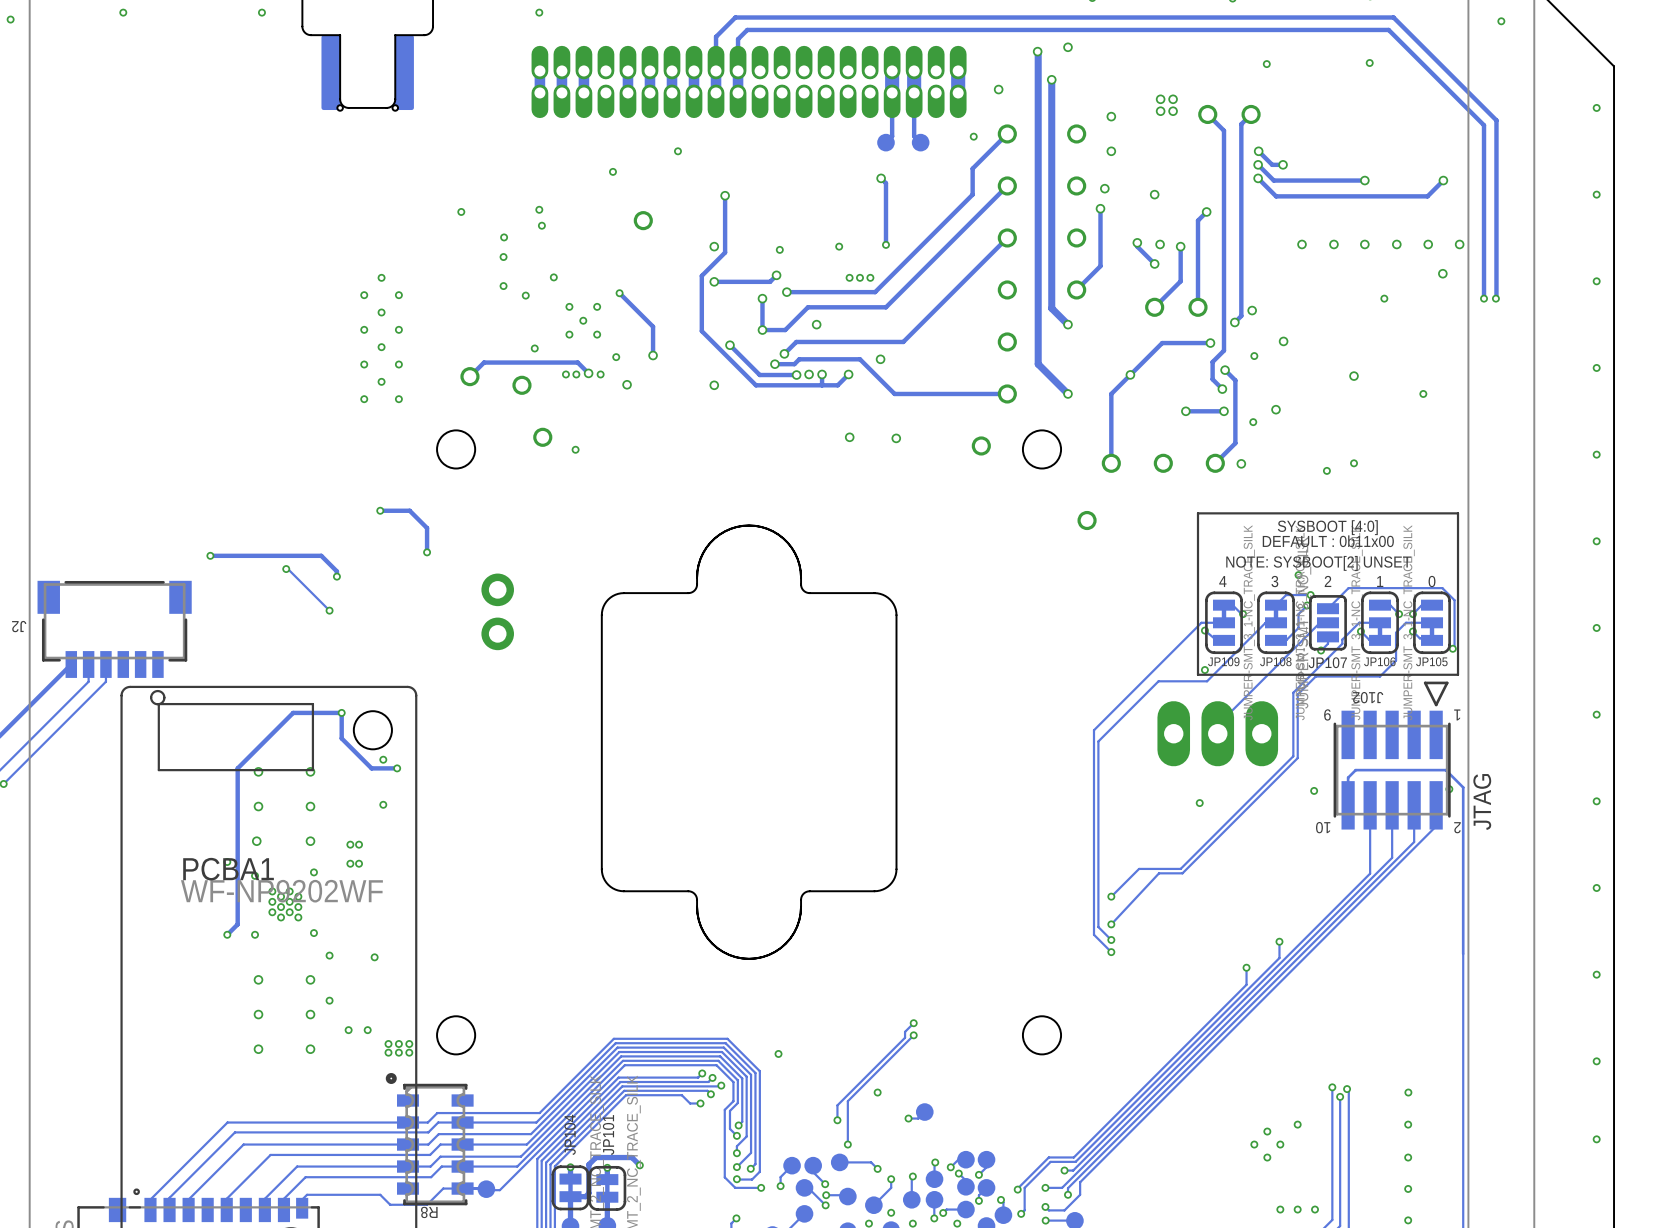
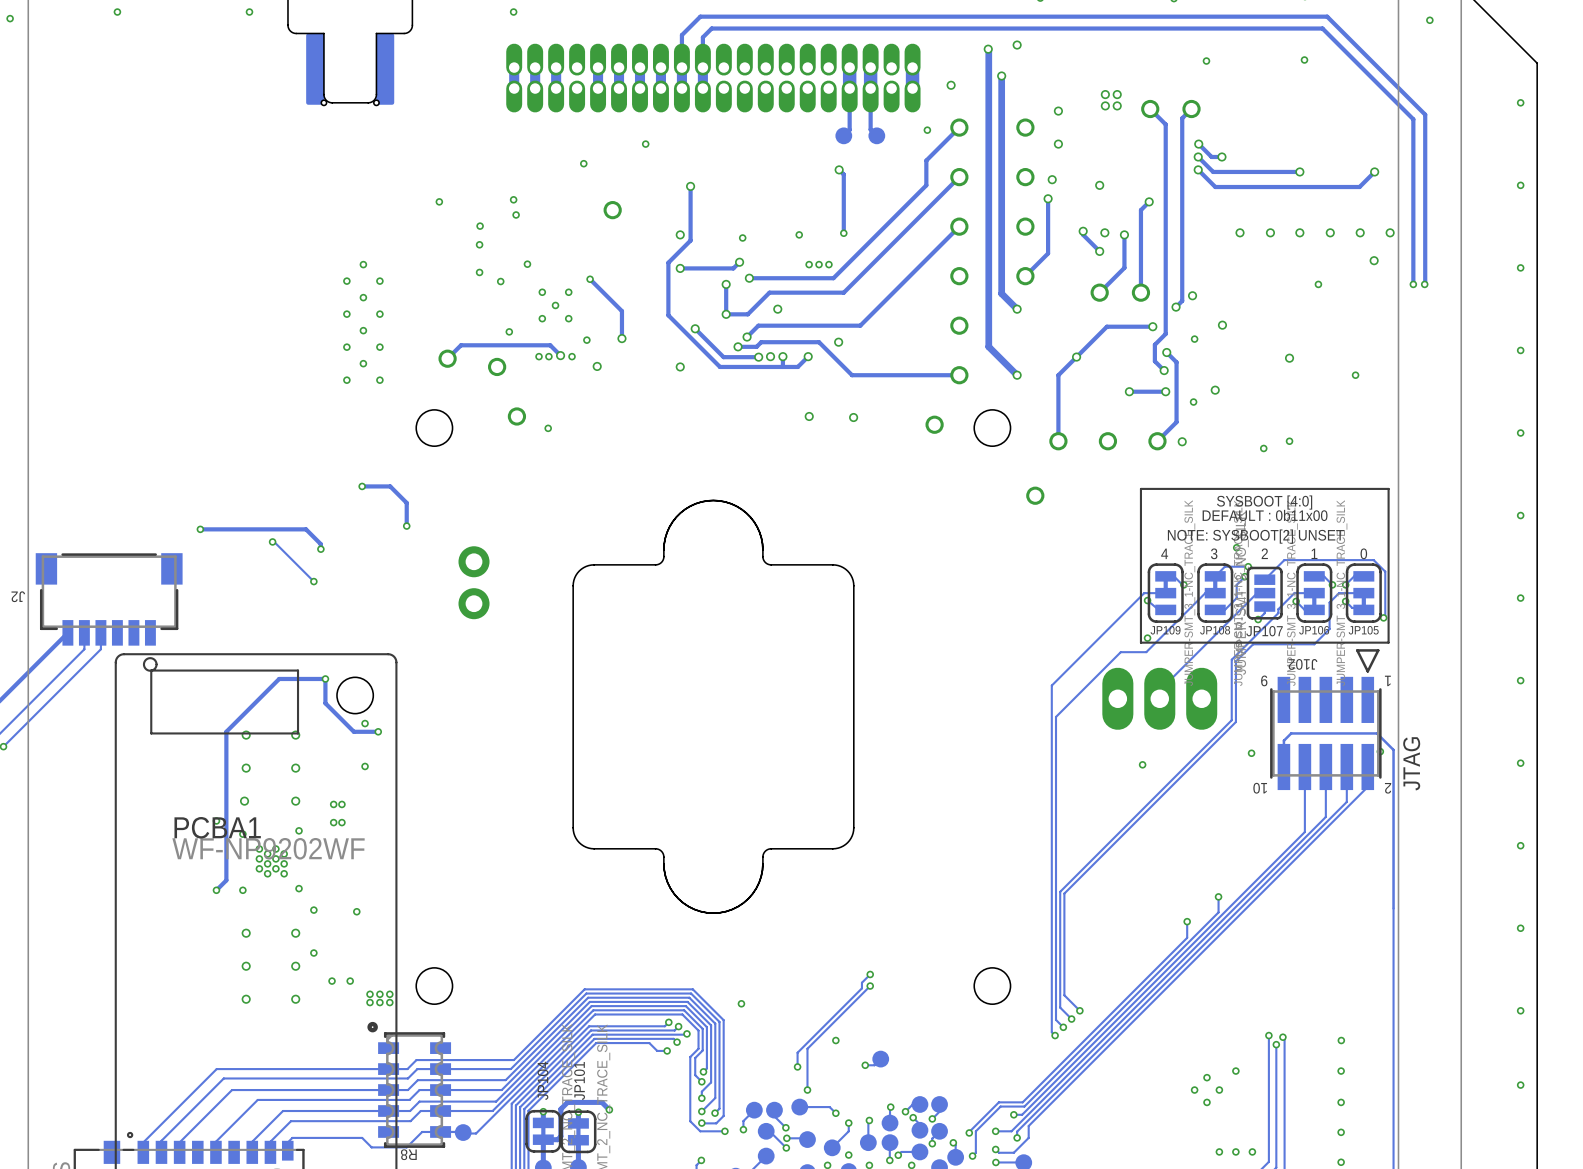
track: (1207, 681) (1158, 681) (1098, 741) (1098, 927) (1111, 939) -> (1149, 648) (1146, 652) (1120, 652) (1056, 716) (1056, 1019) (1063, 1027)
track: (1104, 719) (1093, 730) (1093, 934) (1111, 952) -> (1051, 685) (1051, 1032) (1055, 1035)
track: (1180, 868) (1139, 868) (1111, 896) -> (1124, 827) (1060, 891) (1060, 1007) (1071, 1019)
track: (1182, 873) (1159, 873) (1111, 924) -> (1126, 831) (1064, 893) (1064, 995) (1079, 1010)
via: (1111, 896) -> none
via: (1111, 924) -> none
via: (1111, 939) -> none
via: (1111, 952) -> none
via: none -> (1079, 1010)
via: none -> (1071, 1019)
via: none -> (1063, 1027)
via: none -> (1055, 1035)

